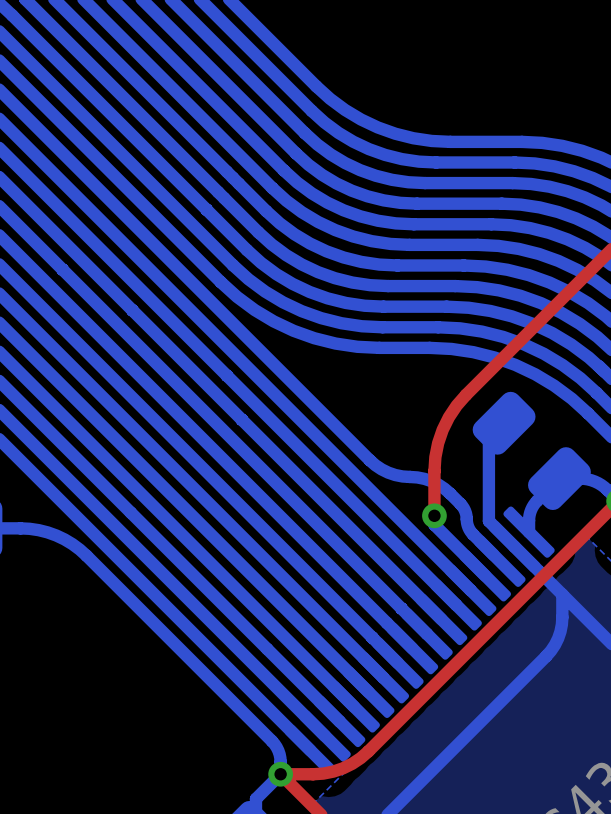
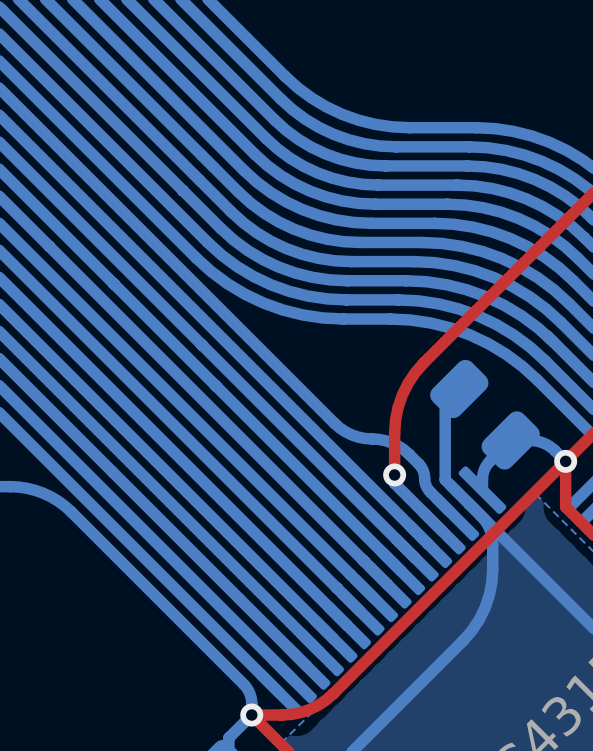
bottom track: (562, 594) (561, 624) (554, 644) (508, 694) -> (480, 515) (487, 523) (492, 538) (491, 582) (485, 607) (479, 619) (463, 640)

